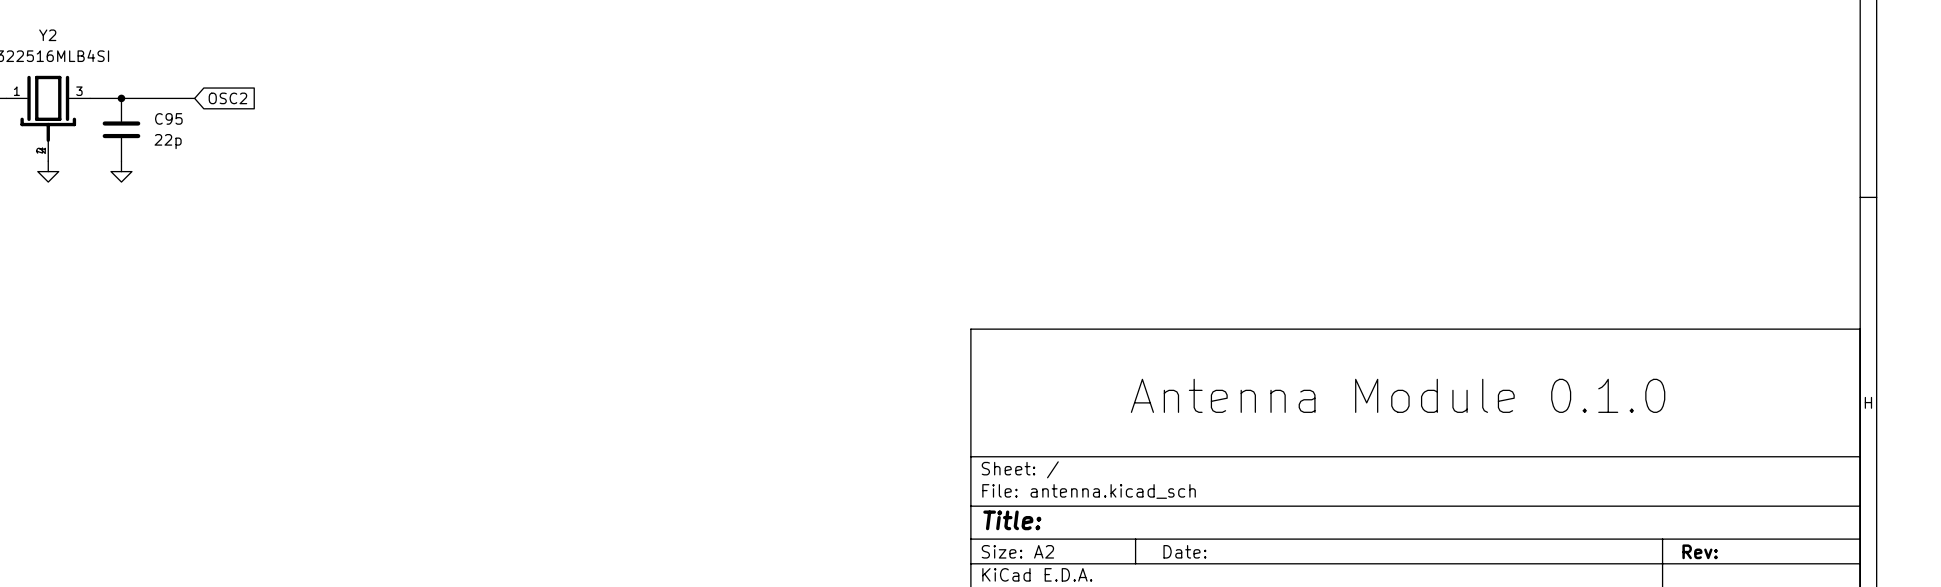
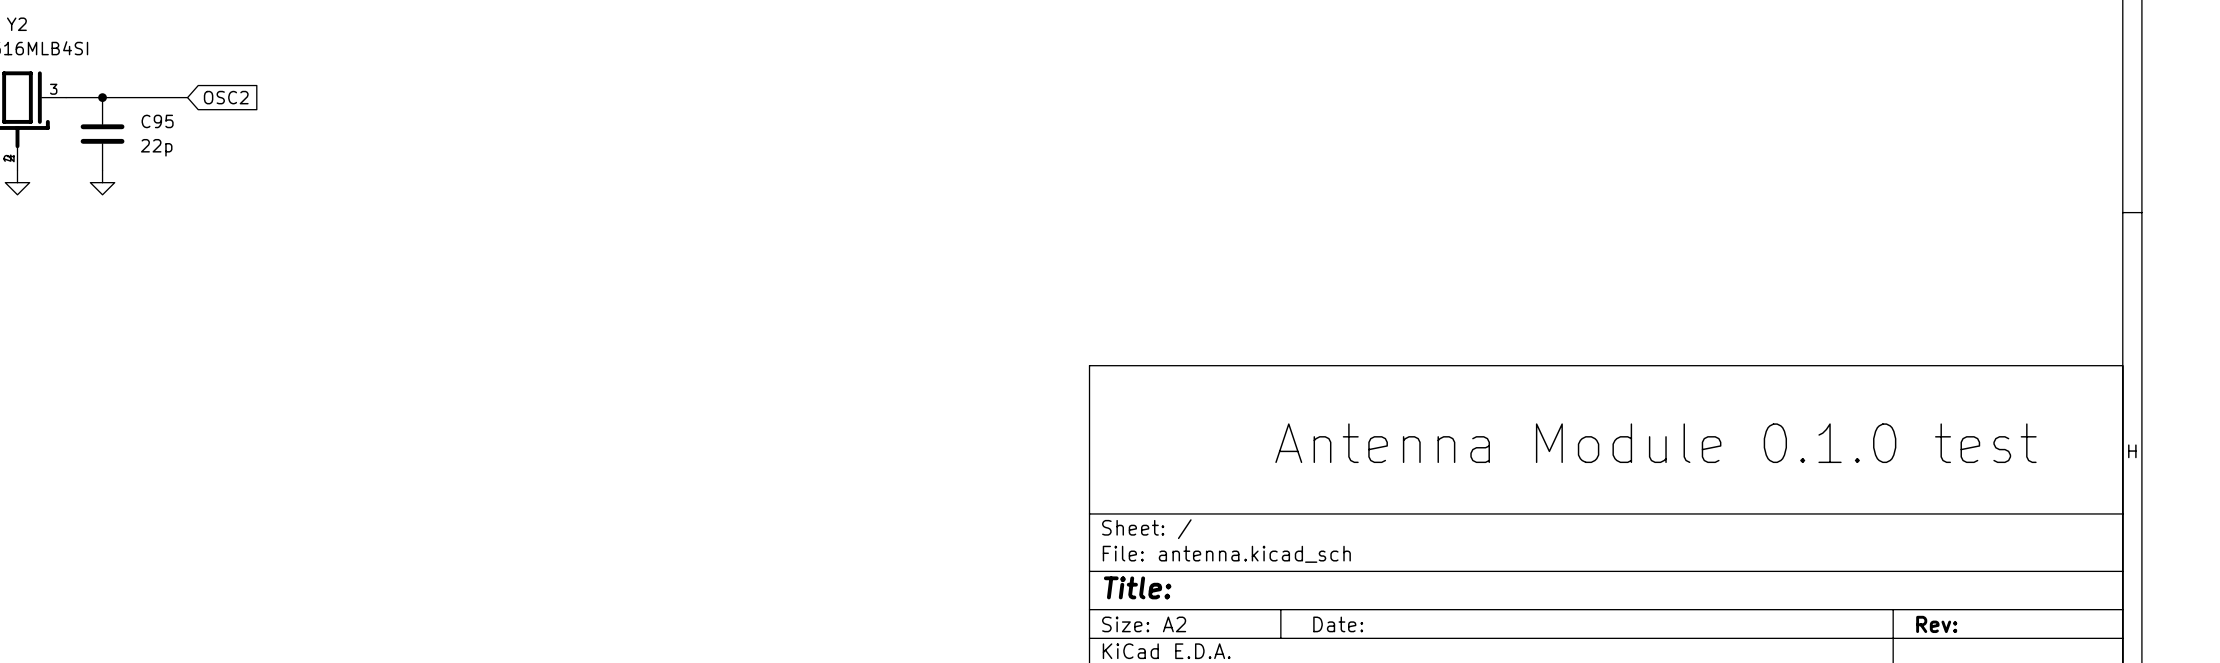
text: Antenna Module 0.1.0 (1398, 395) -> Antenna Module 0.1.0 test (1655, 443)

